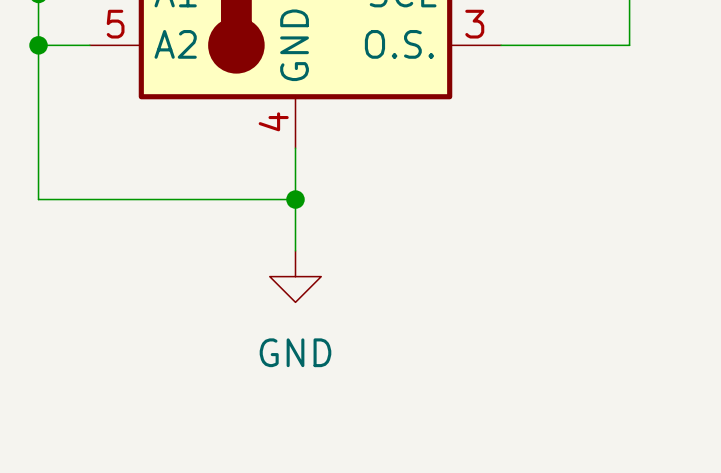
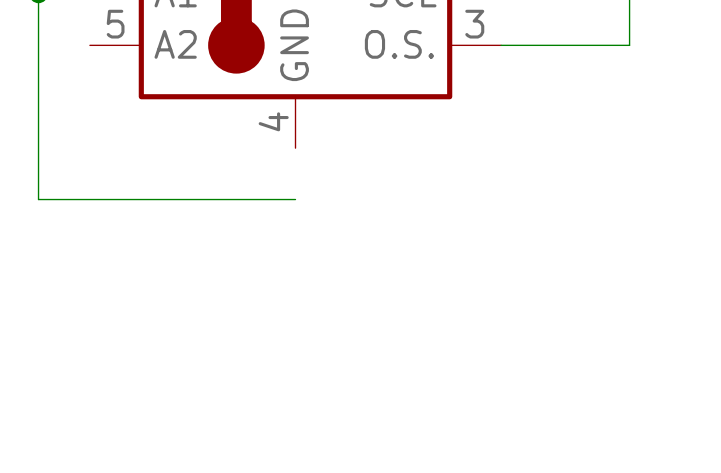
wire: (38, 45) (89, 45) -> none
junction: (38, 45) -> none
wire: (295, 148) (295, 250) -> none
junction: (295, 199) -> none
power symbol: GND (295, 276) -> none

